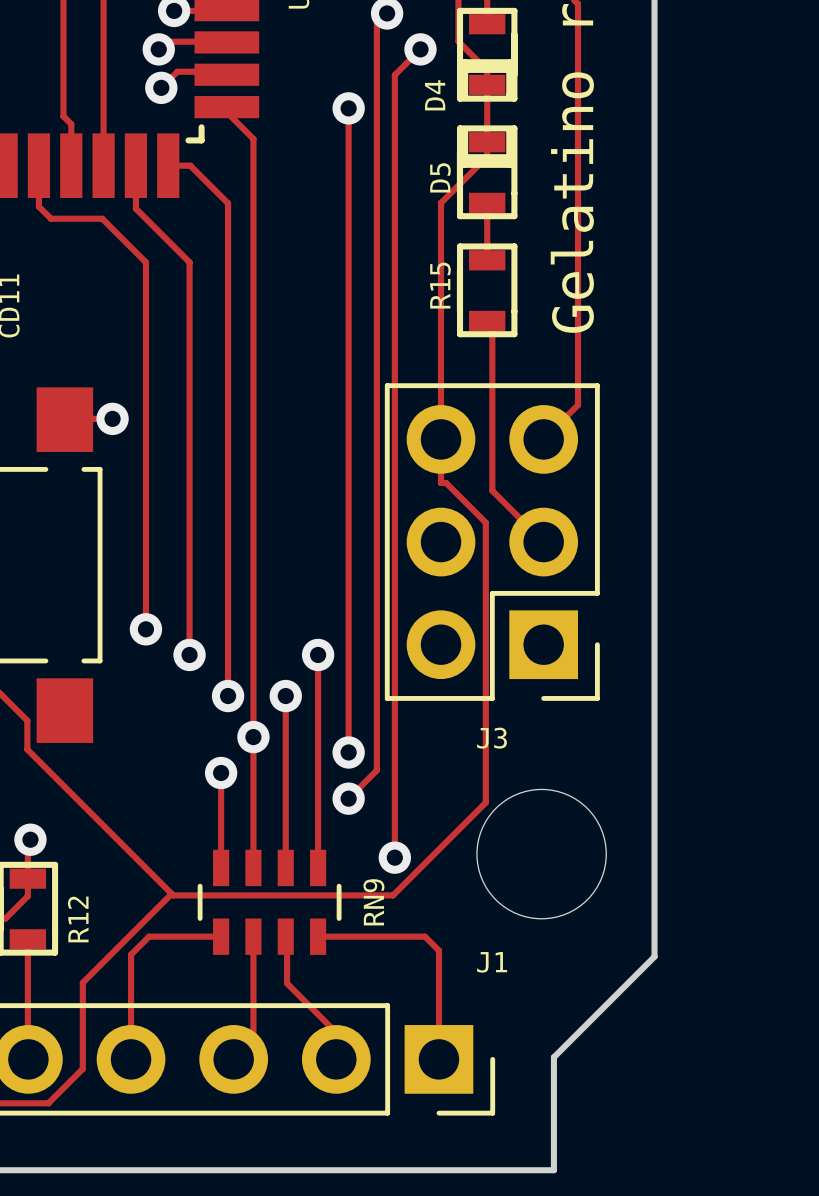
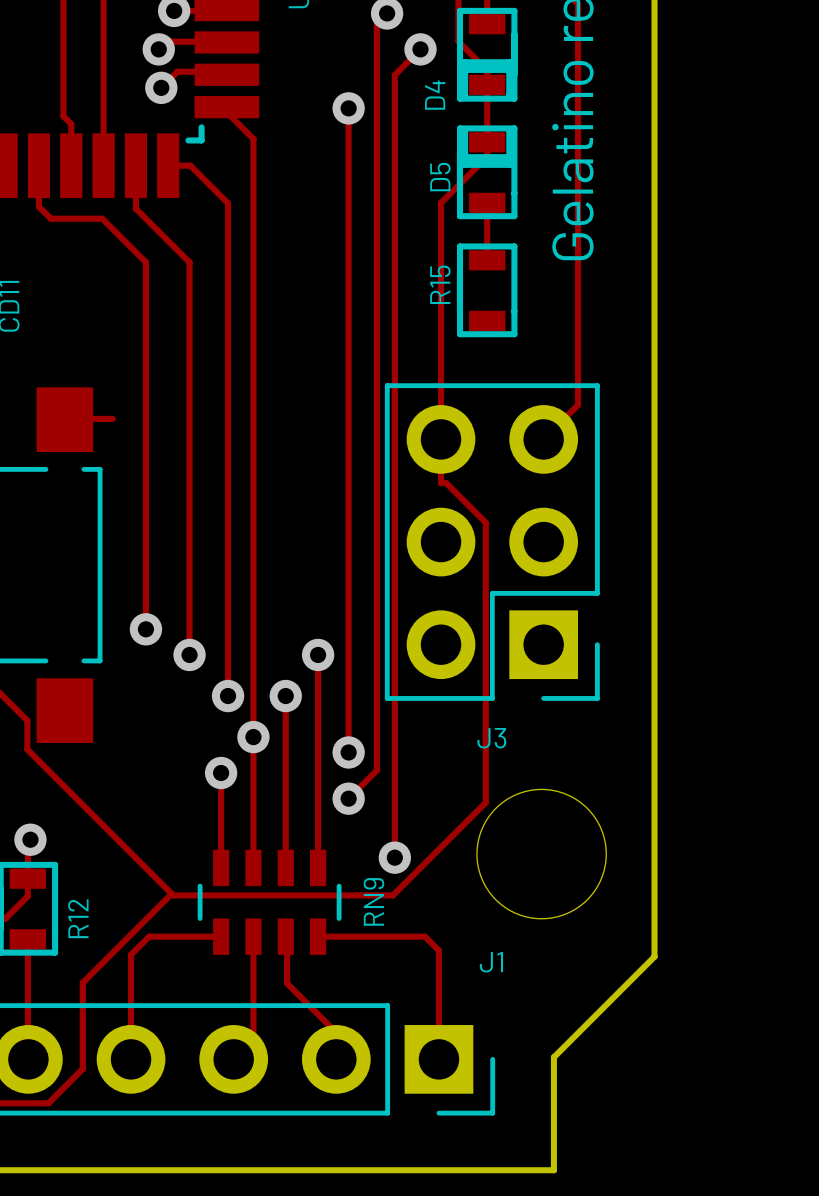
track: (487, 320) (487, 326) (492, 331) (492, 490) (543, 542) -> none
via: (112, 418) -> none

